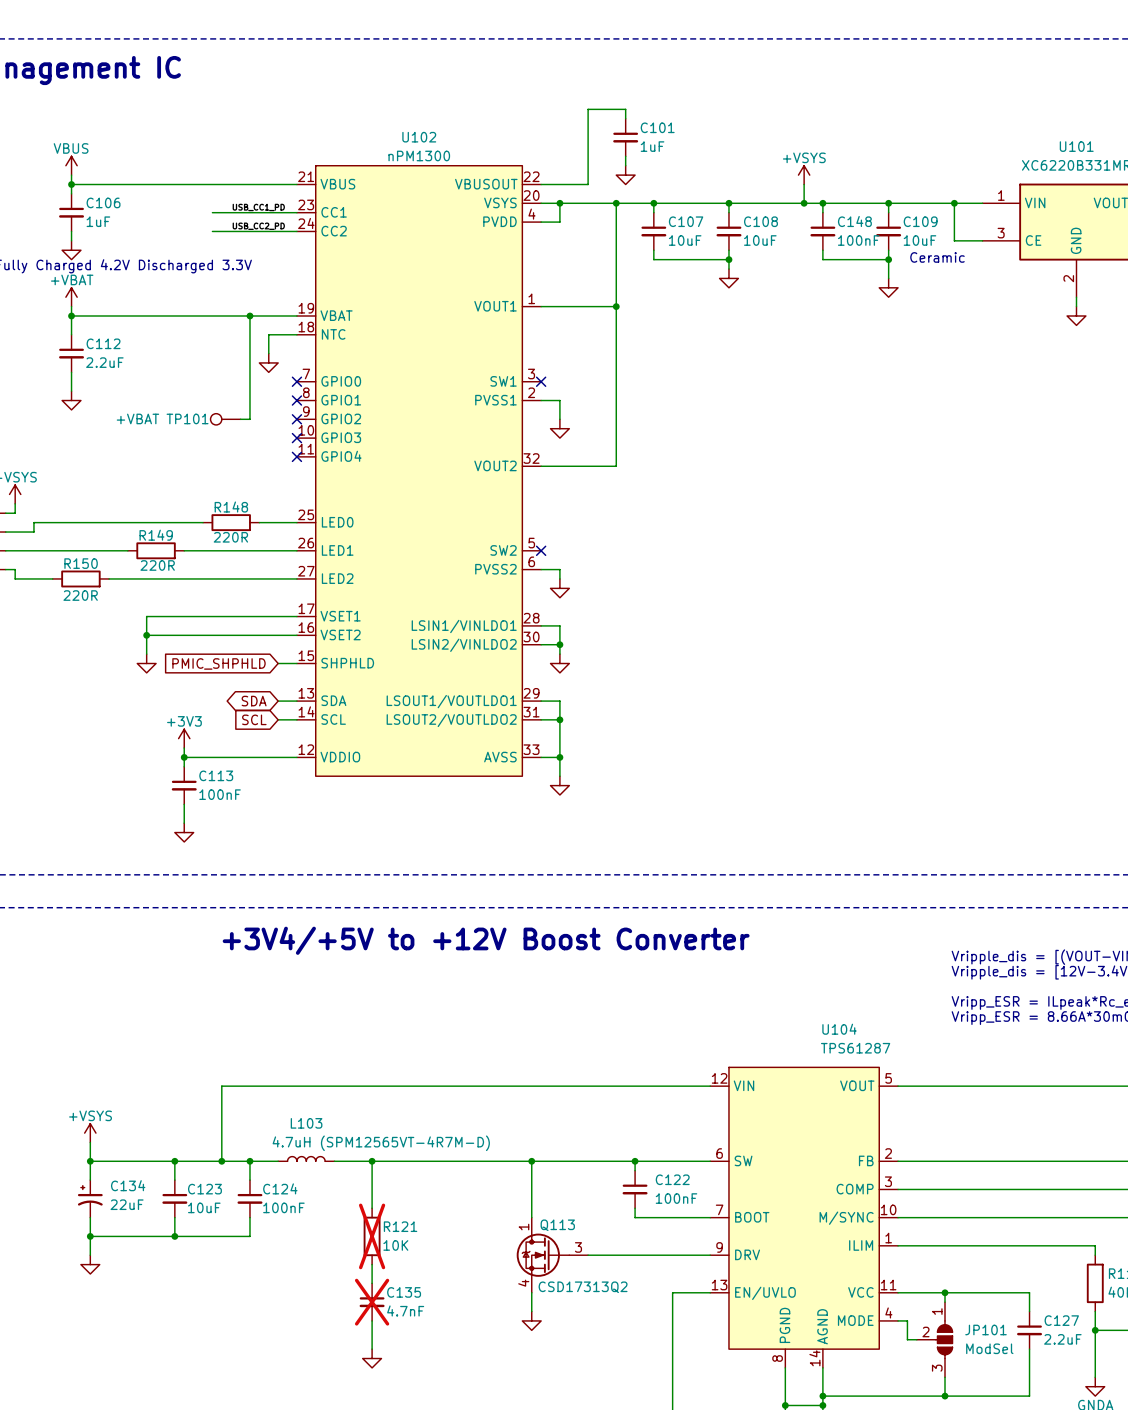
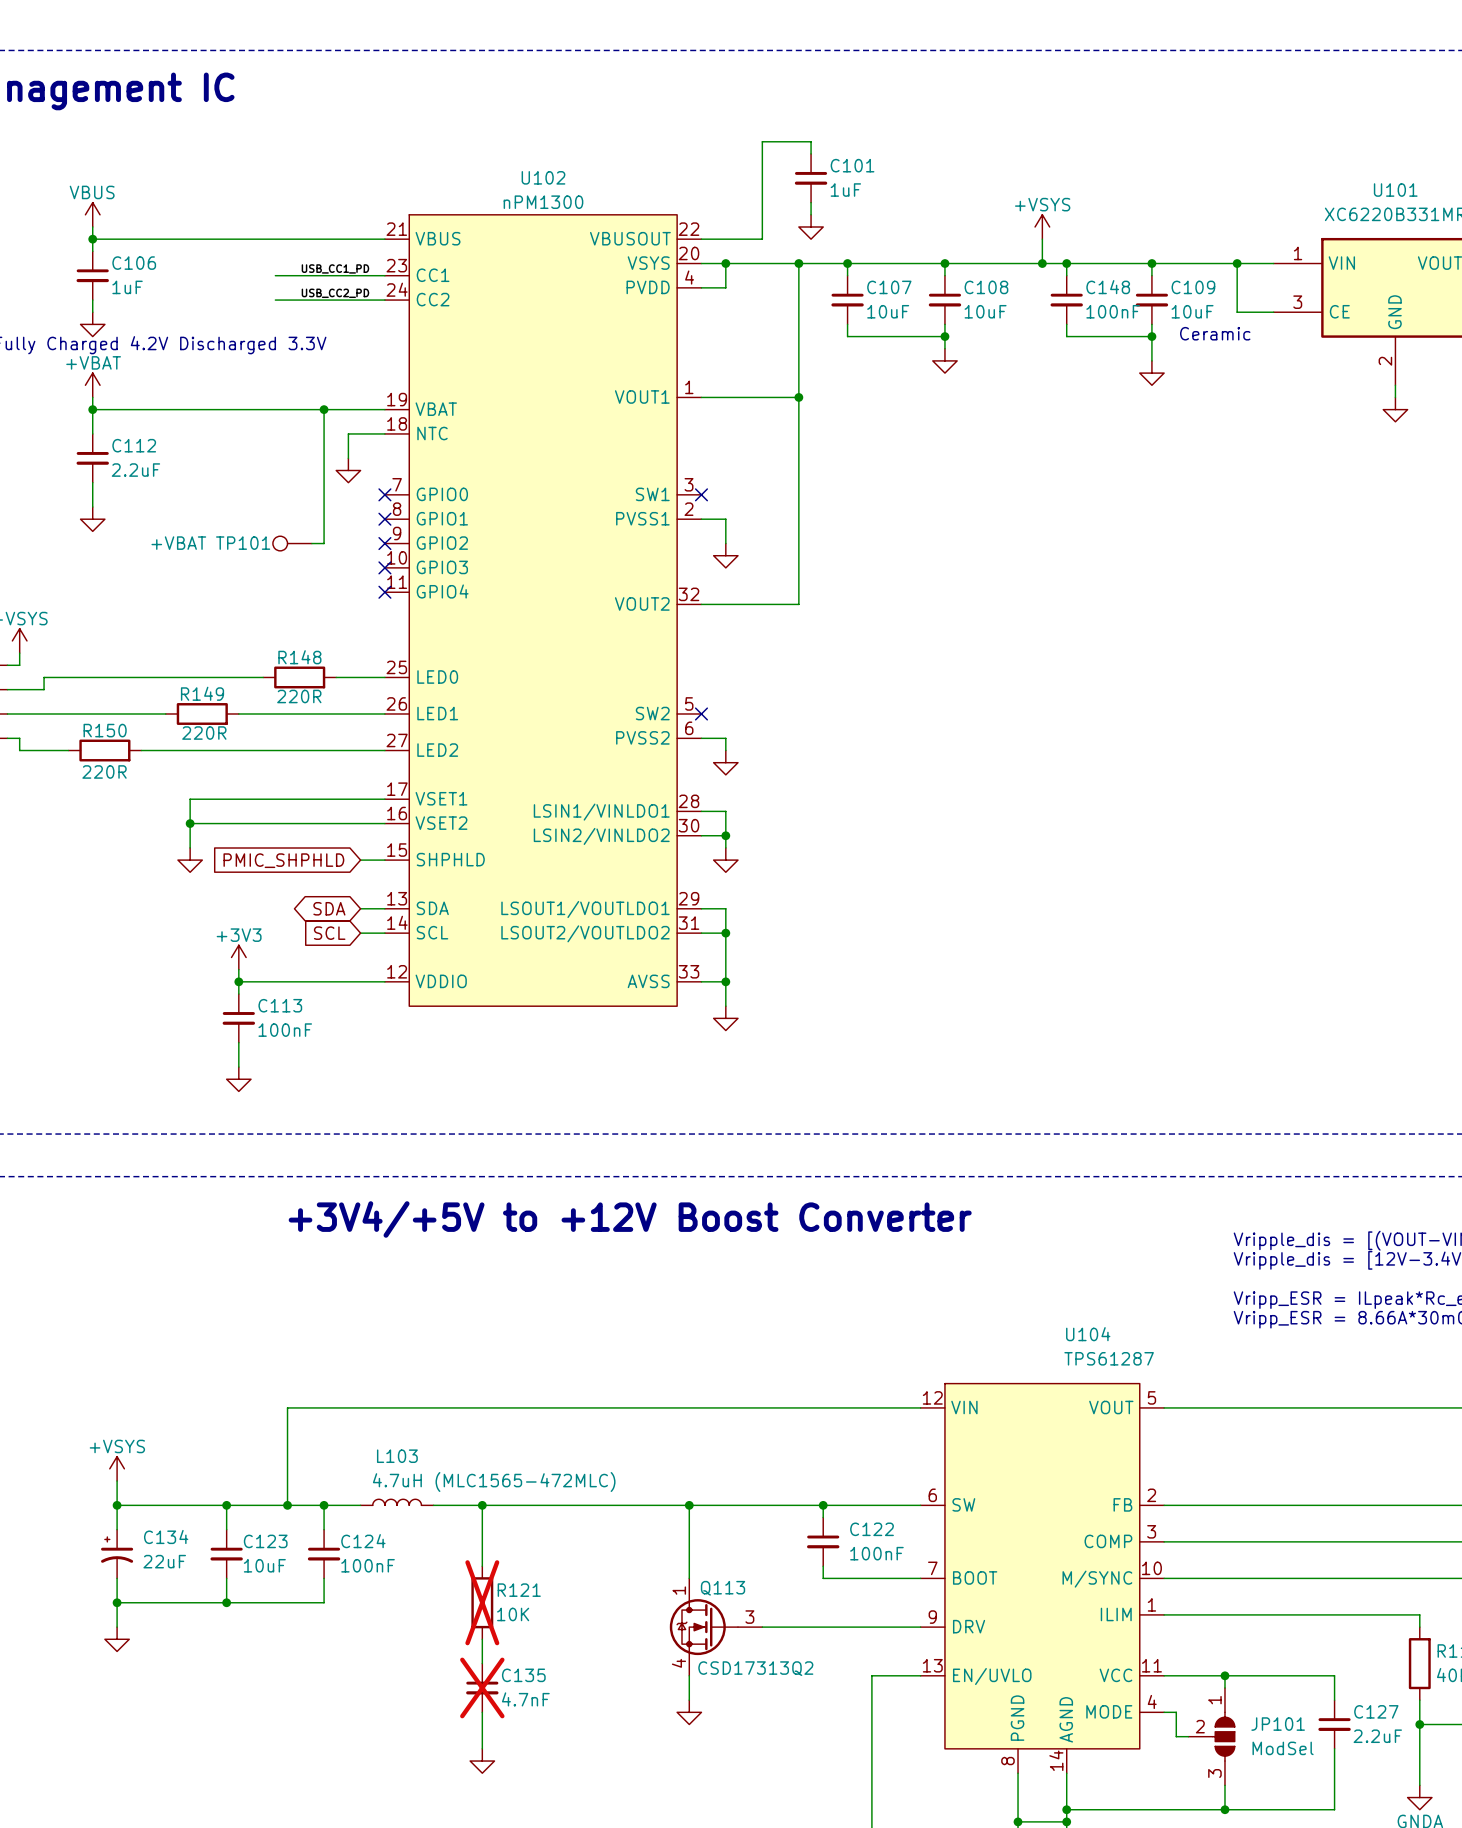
L103 value: 4.7uH (SPM12565VT-4R7M-D) (381, 1143) -> 4.7uH (MLC1565-472MLC) (494, 1482)

